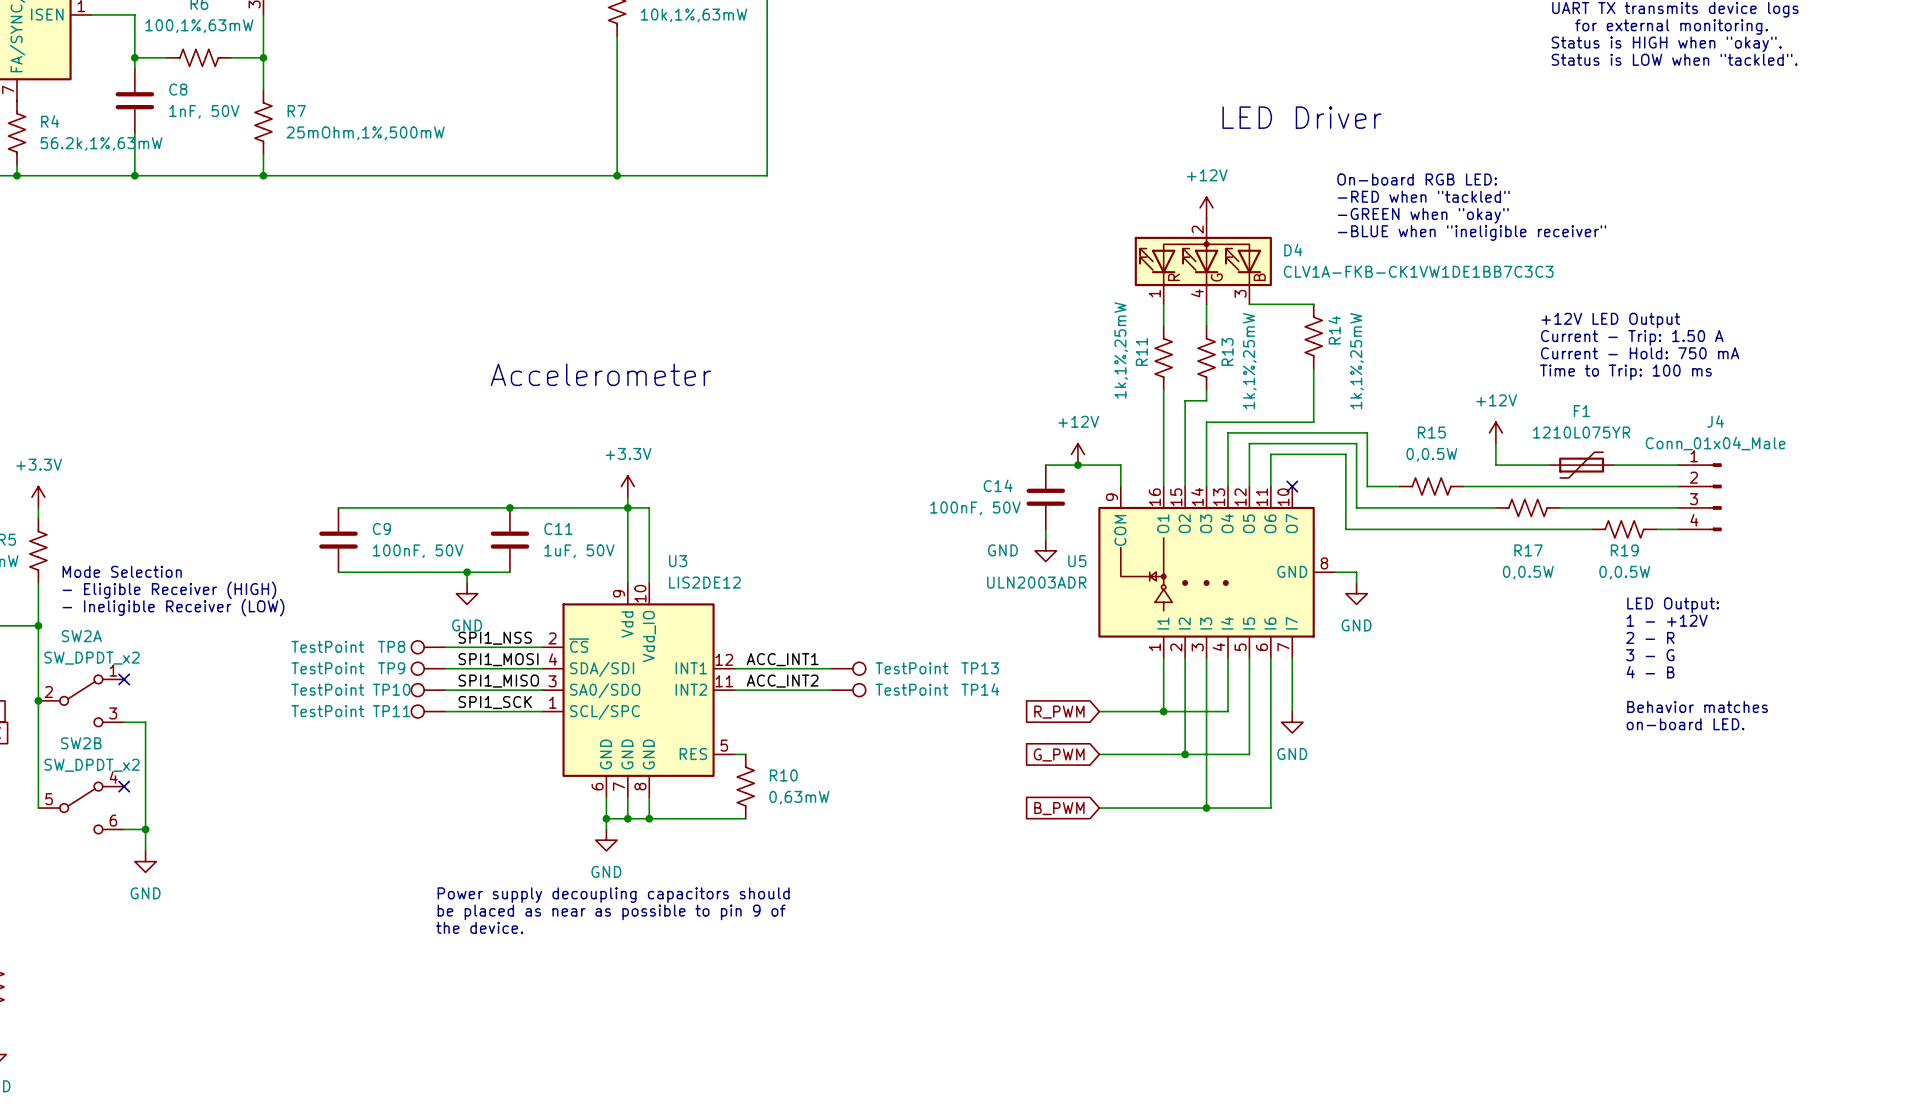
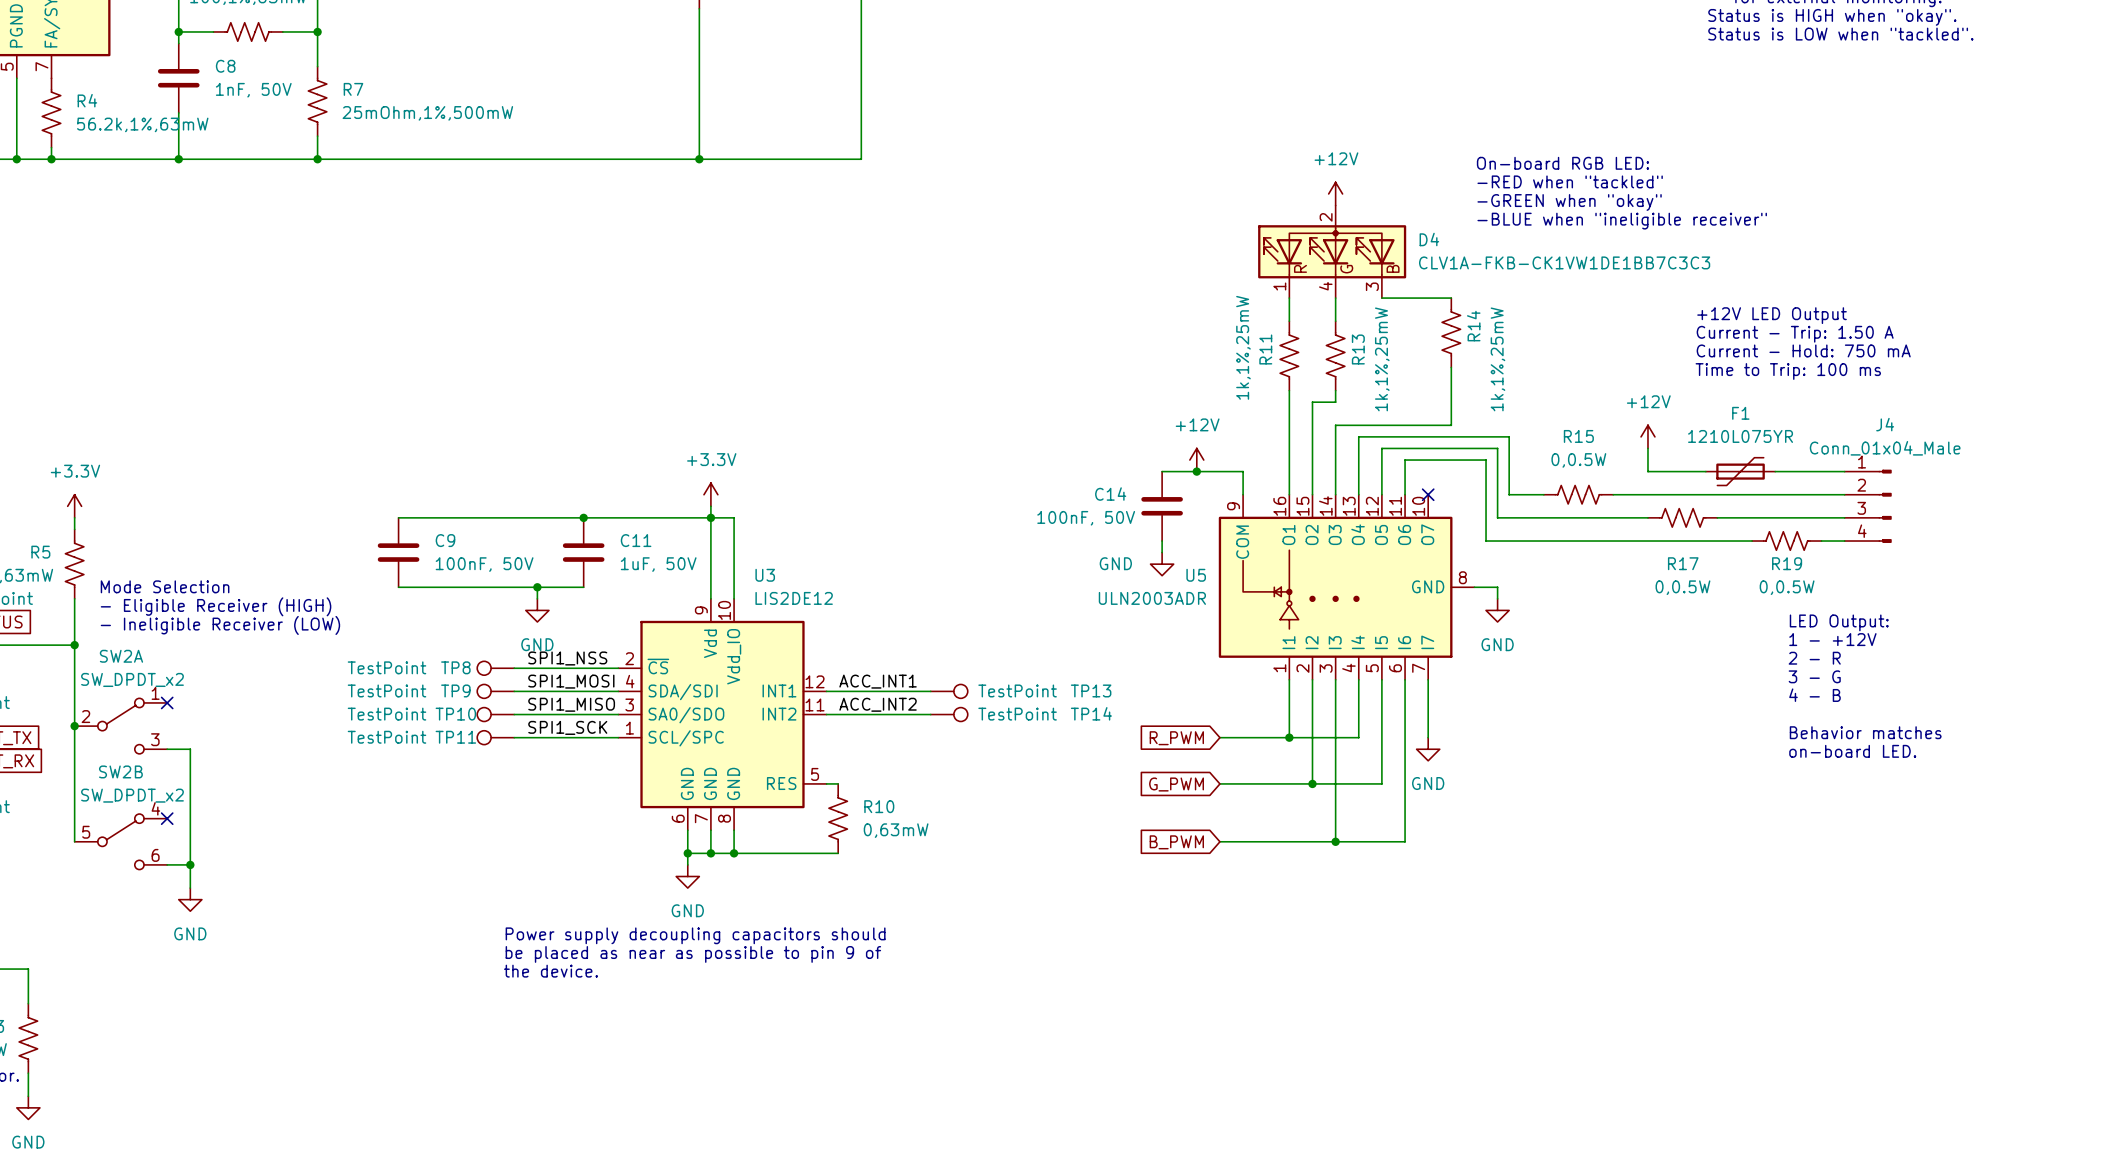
text: LED Driver (1301, 117) -> none
text: Accelerometer (600, 374) -> none

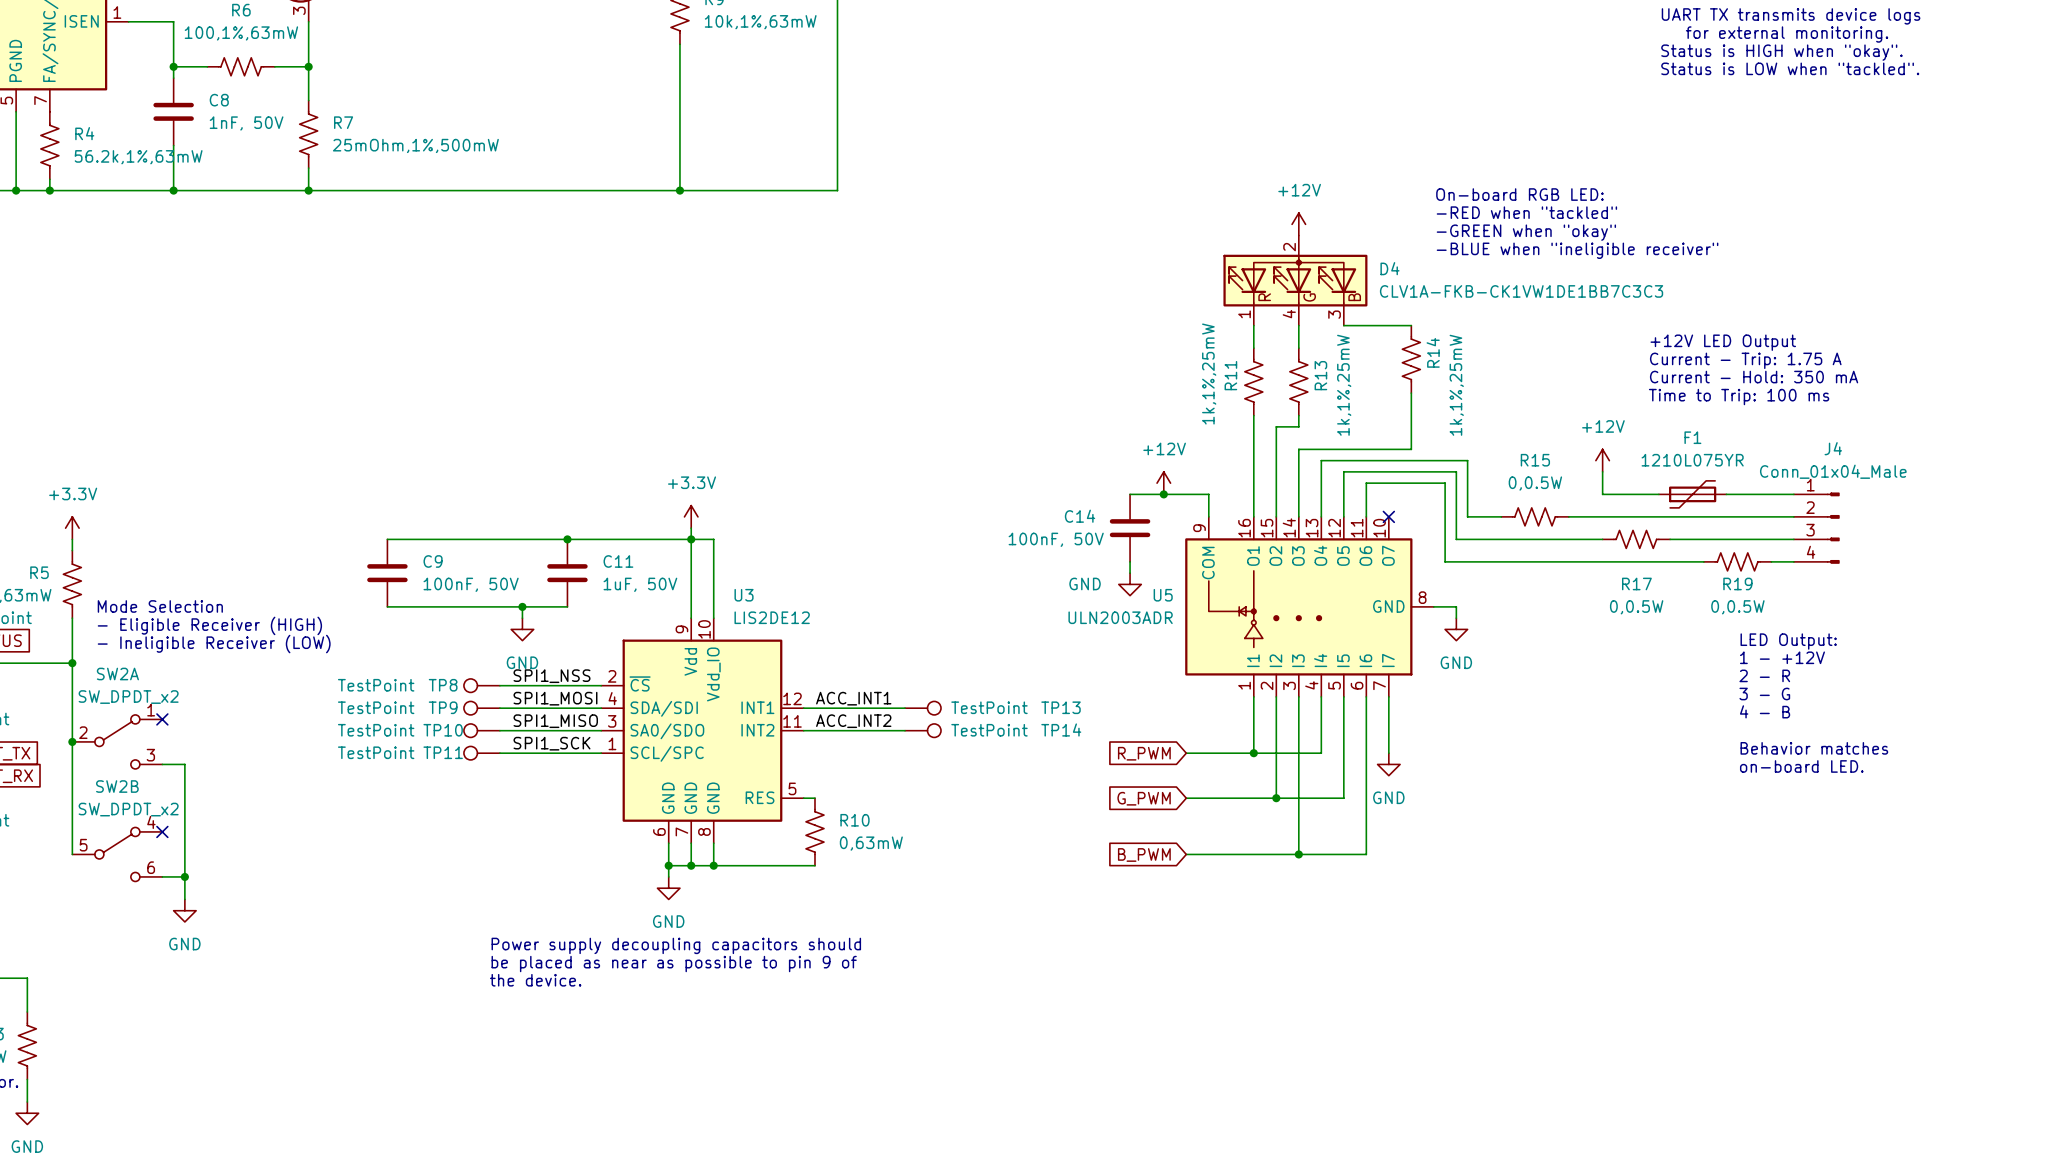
text: Current - Trip: 1.50 A (1795, 334) -> Current - Trip: 1.75 A (1745, 360)
text: Current - Hold: 750 mA (1803, 350) -> Current - Hold: 350 mA (1754, 377)

